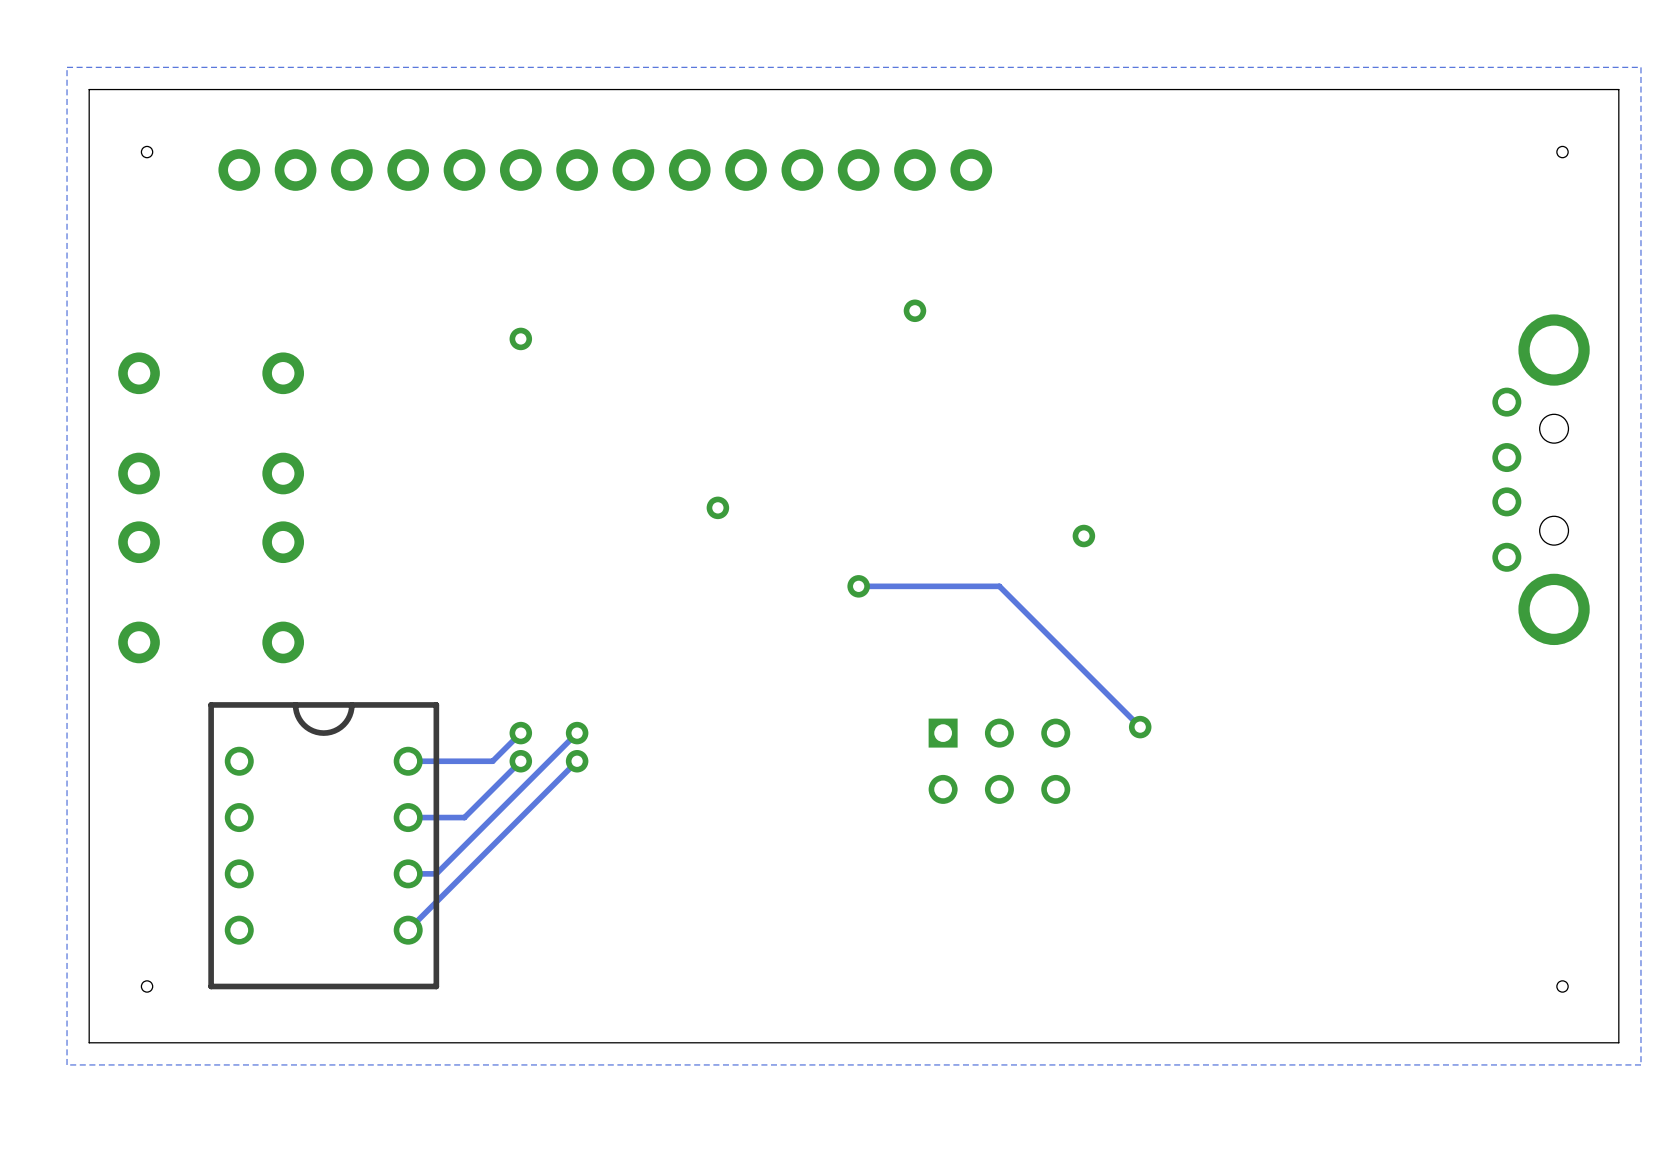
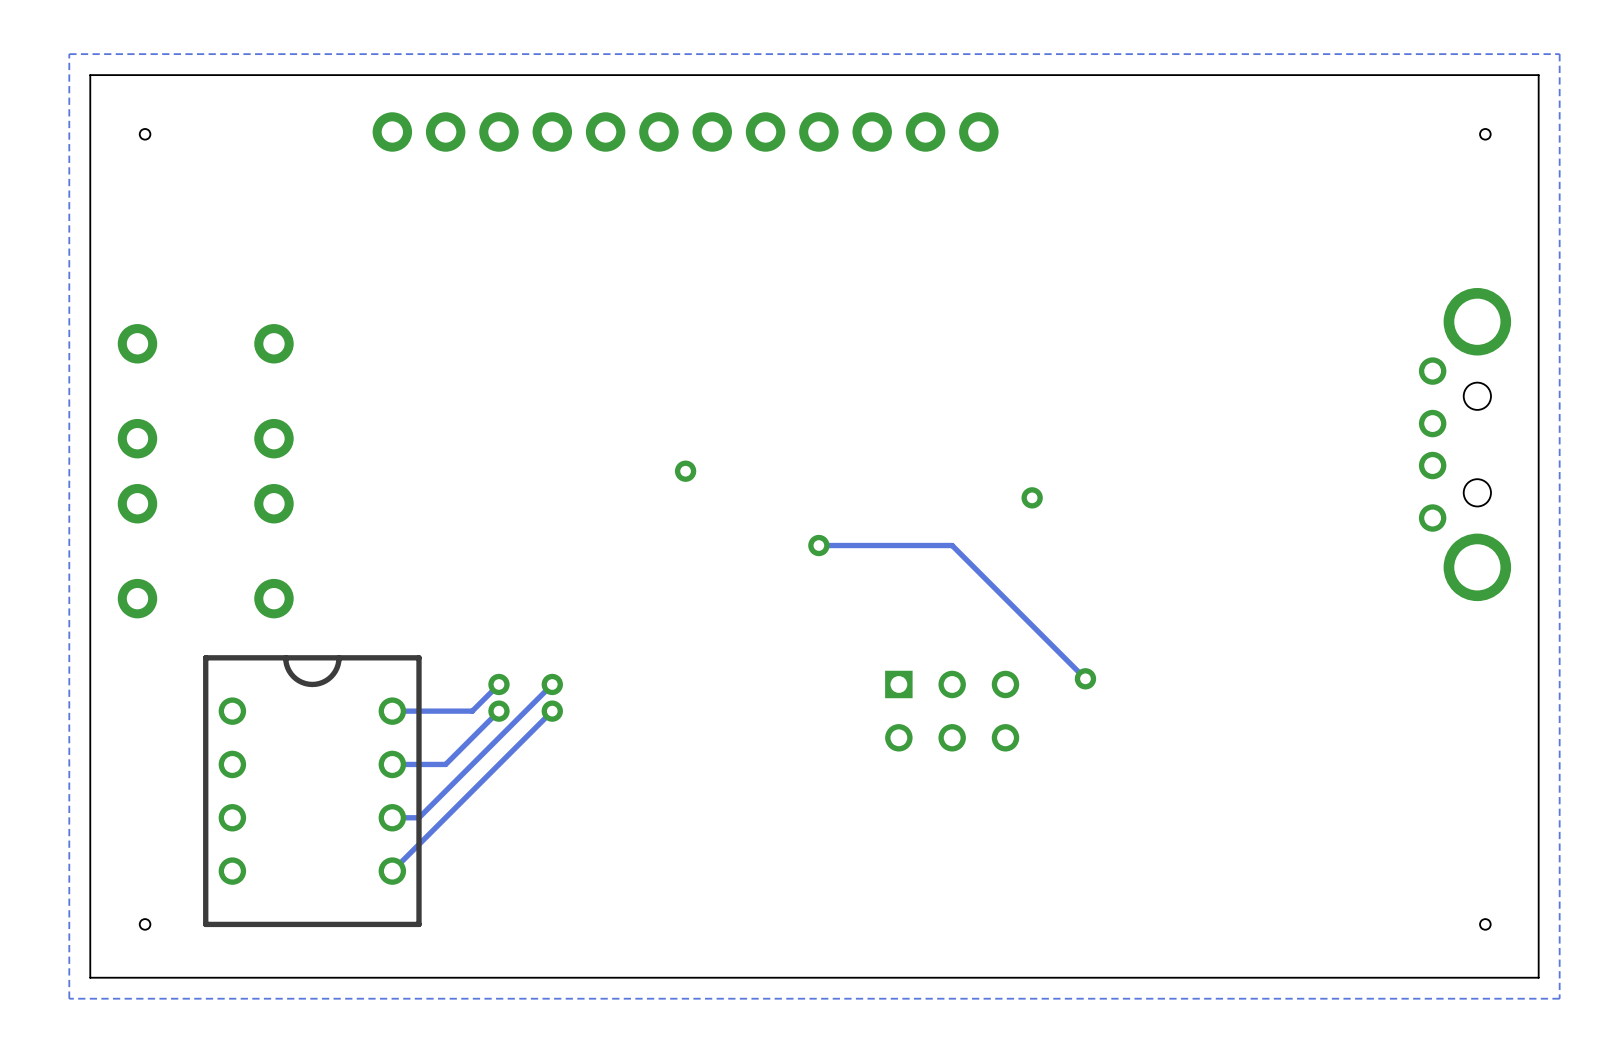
part: none -> (685, 131)
part: (605, 170) -> none
via: (914, 310) -> none
via: (520, 338) -> none

